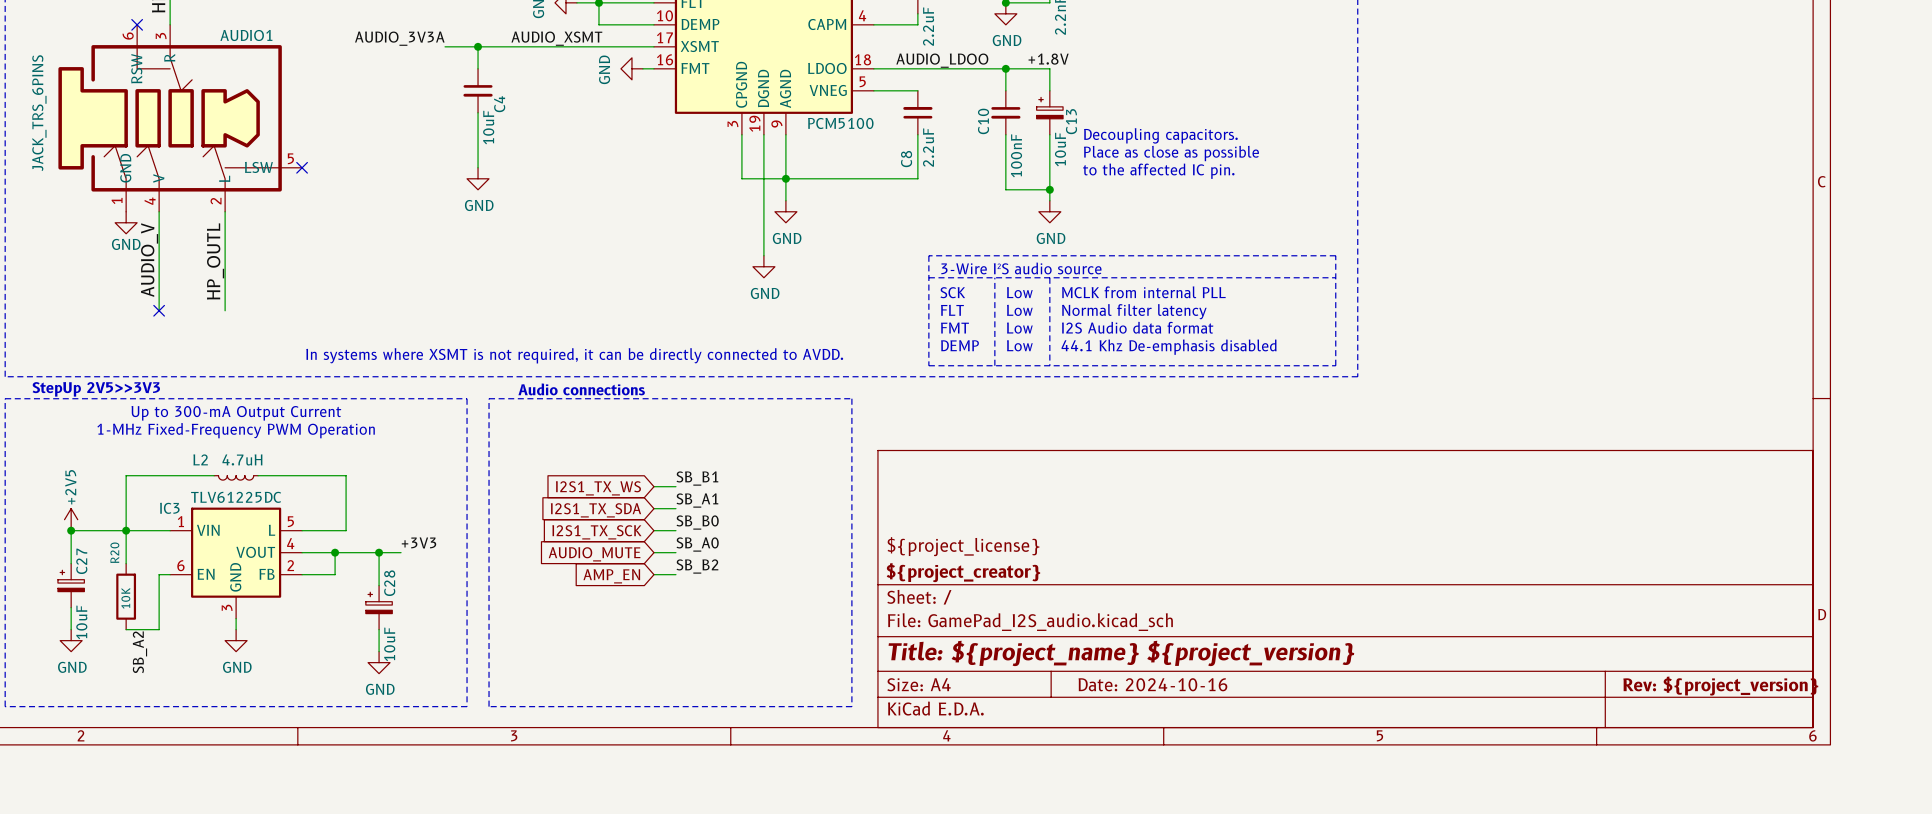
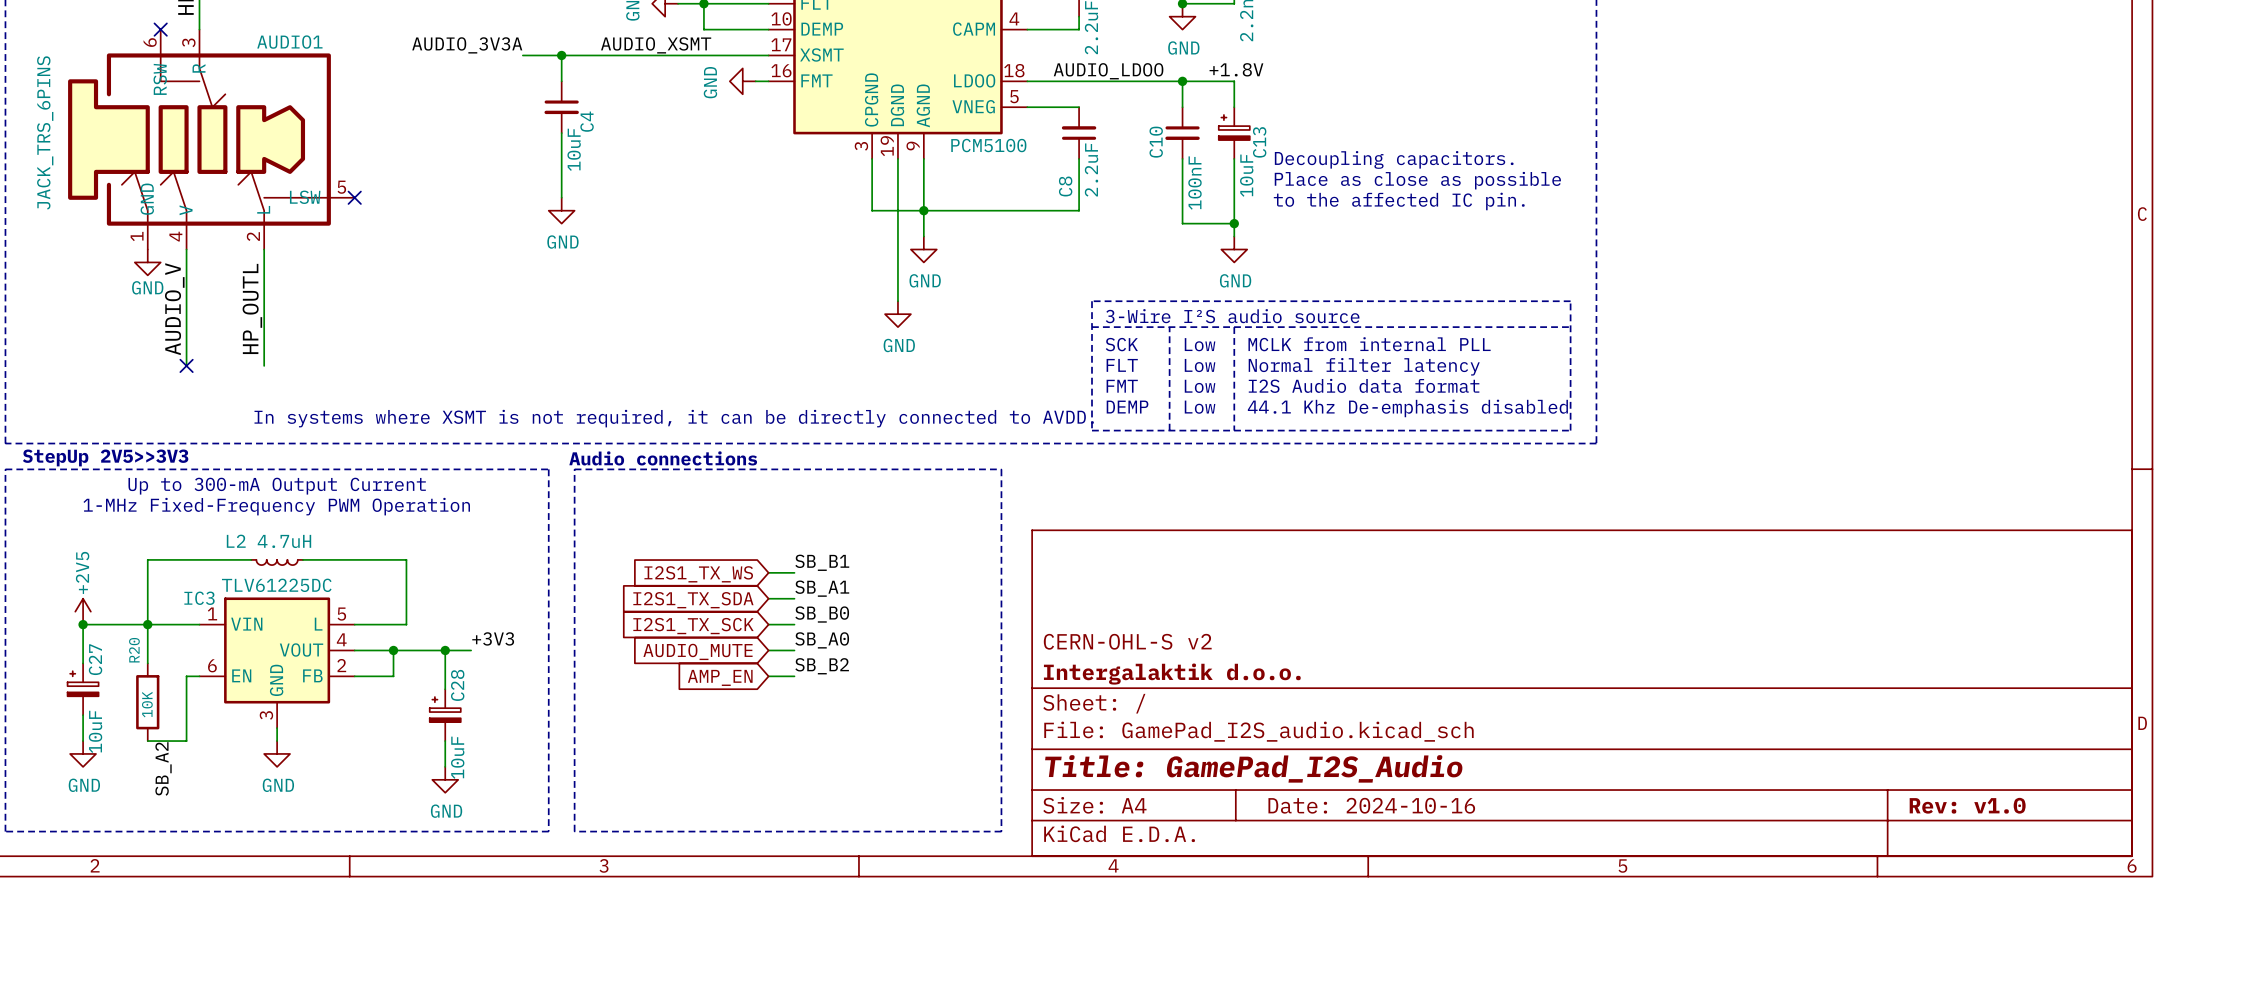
title block: ${project_license} (963, 546) -> CERN-OHL-S v2 (1127, 641)
title block: ${project_creator} (963, 572) -> Intergalaktik d.o.o. (1172, 674)
title block: Title: ${project_name} ${project_version} (1121, 653) -> Title: GamePad_I2S_Audio (1253, 768)
title block: Rev: ${project_version} (1720, 686) -> Rev: v1.0 (1967, 805)

